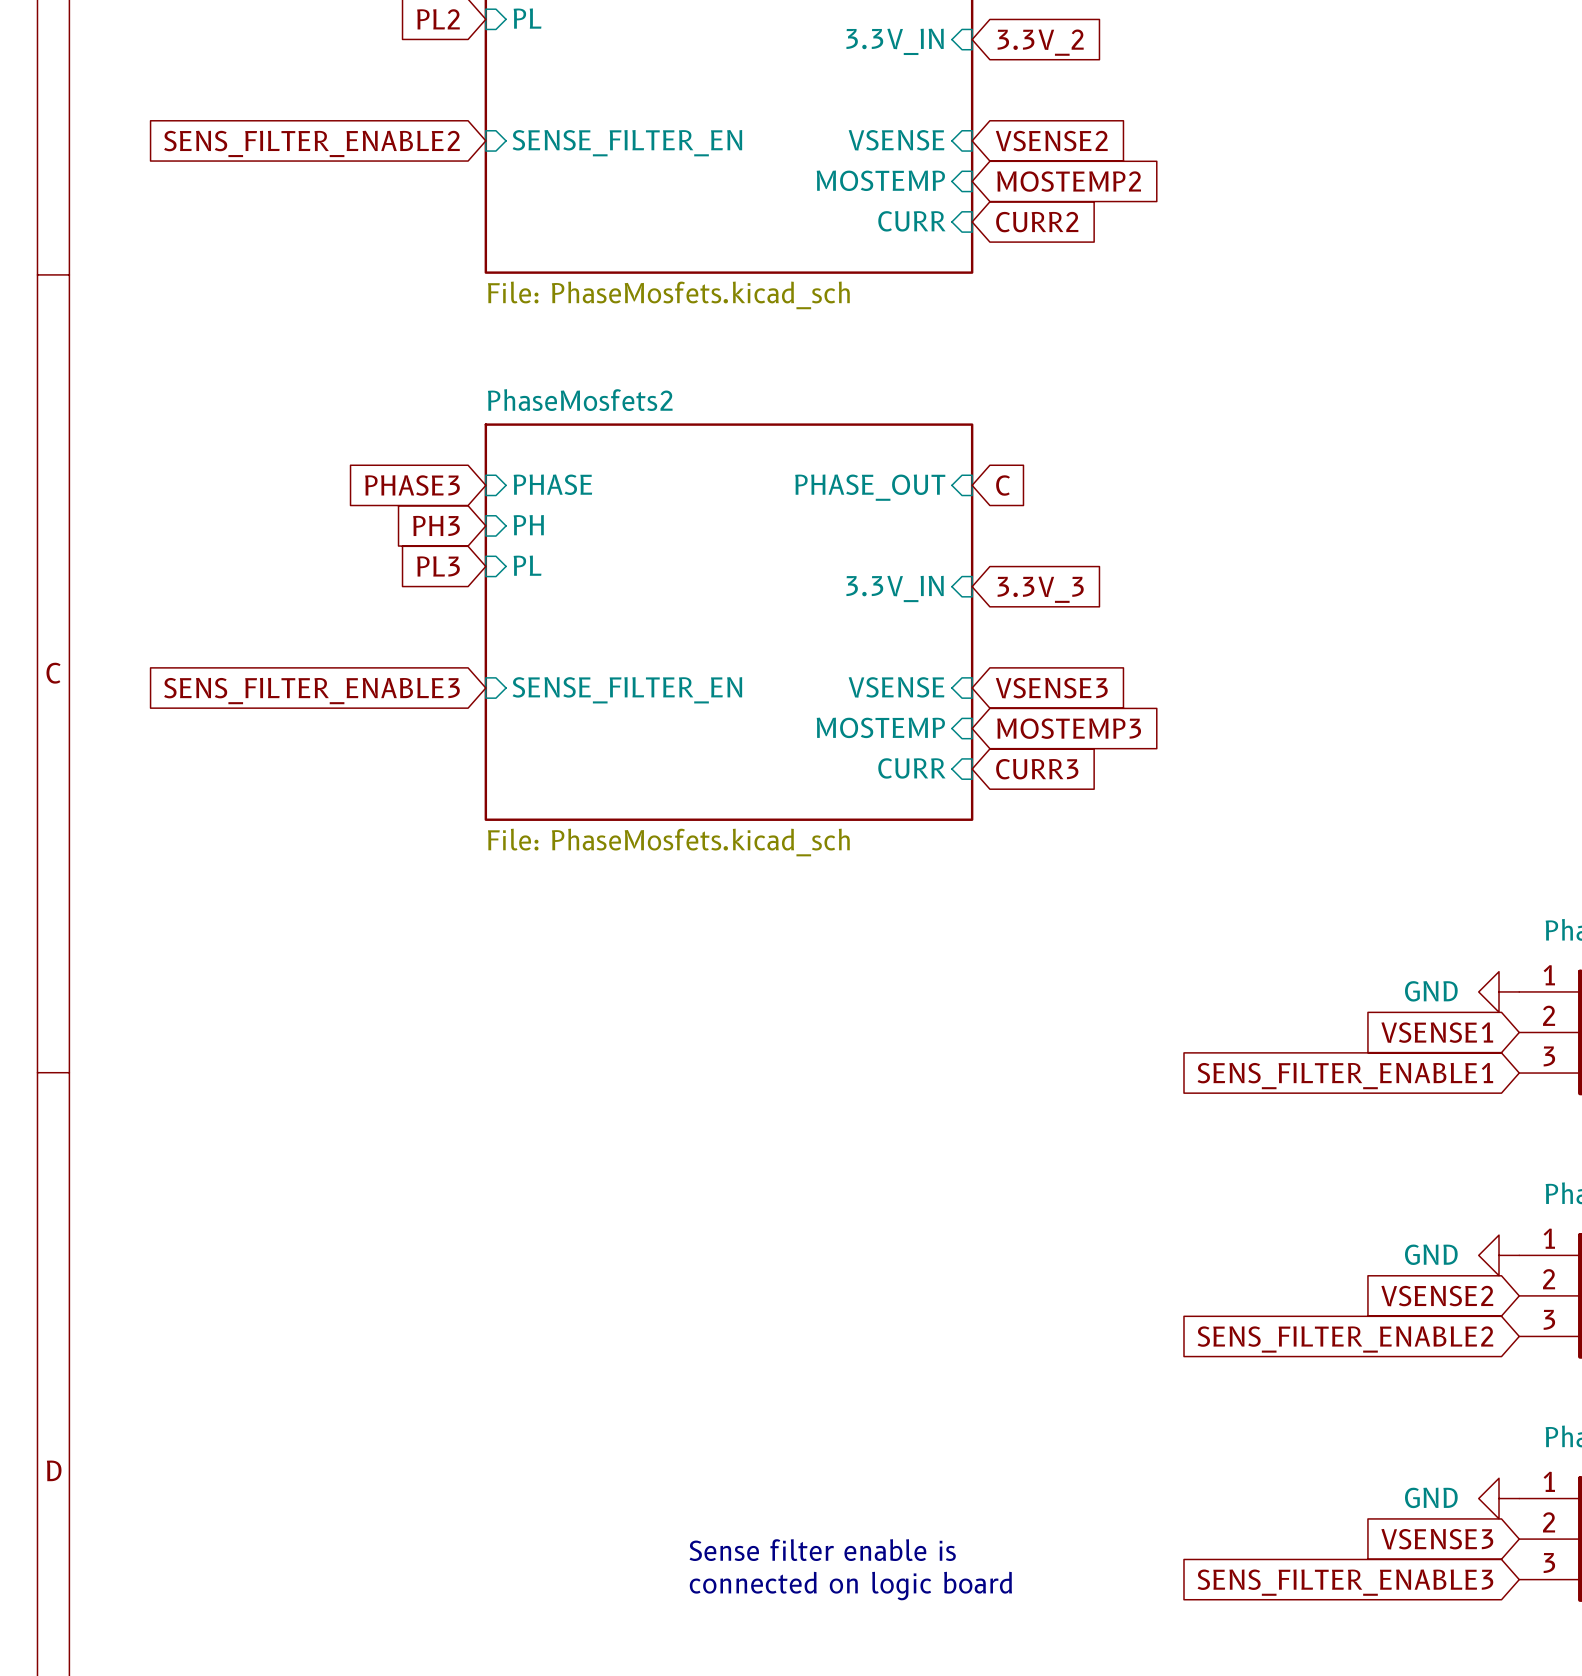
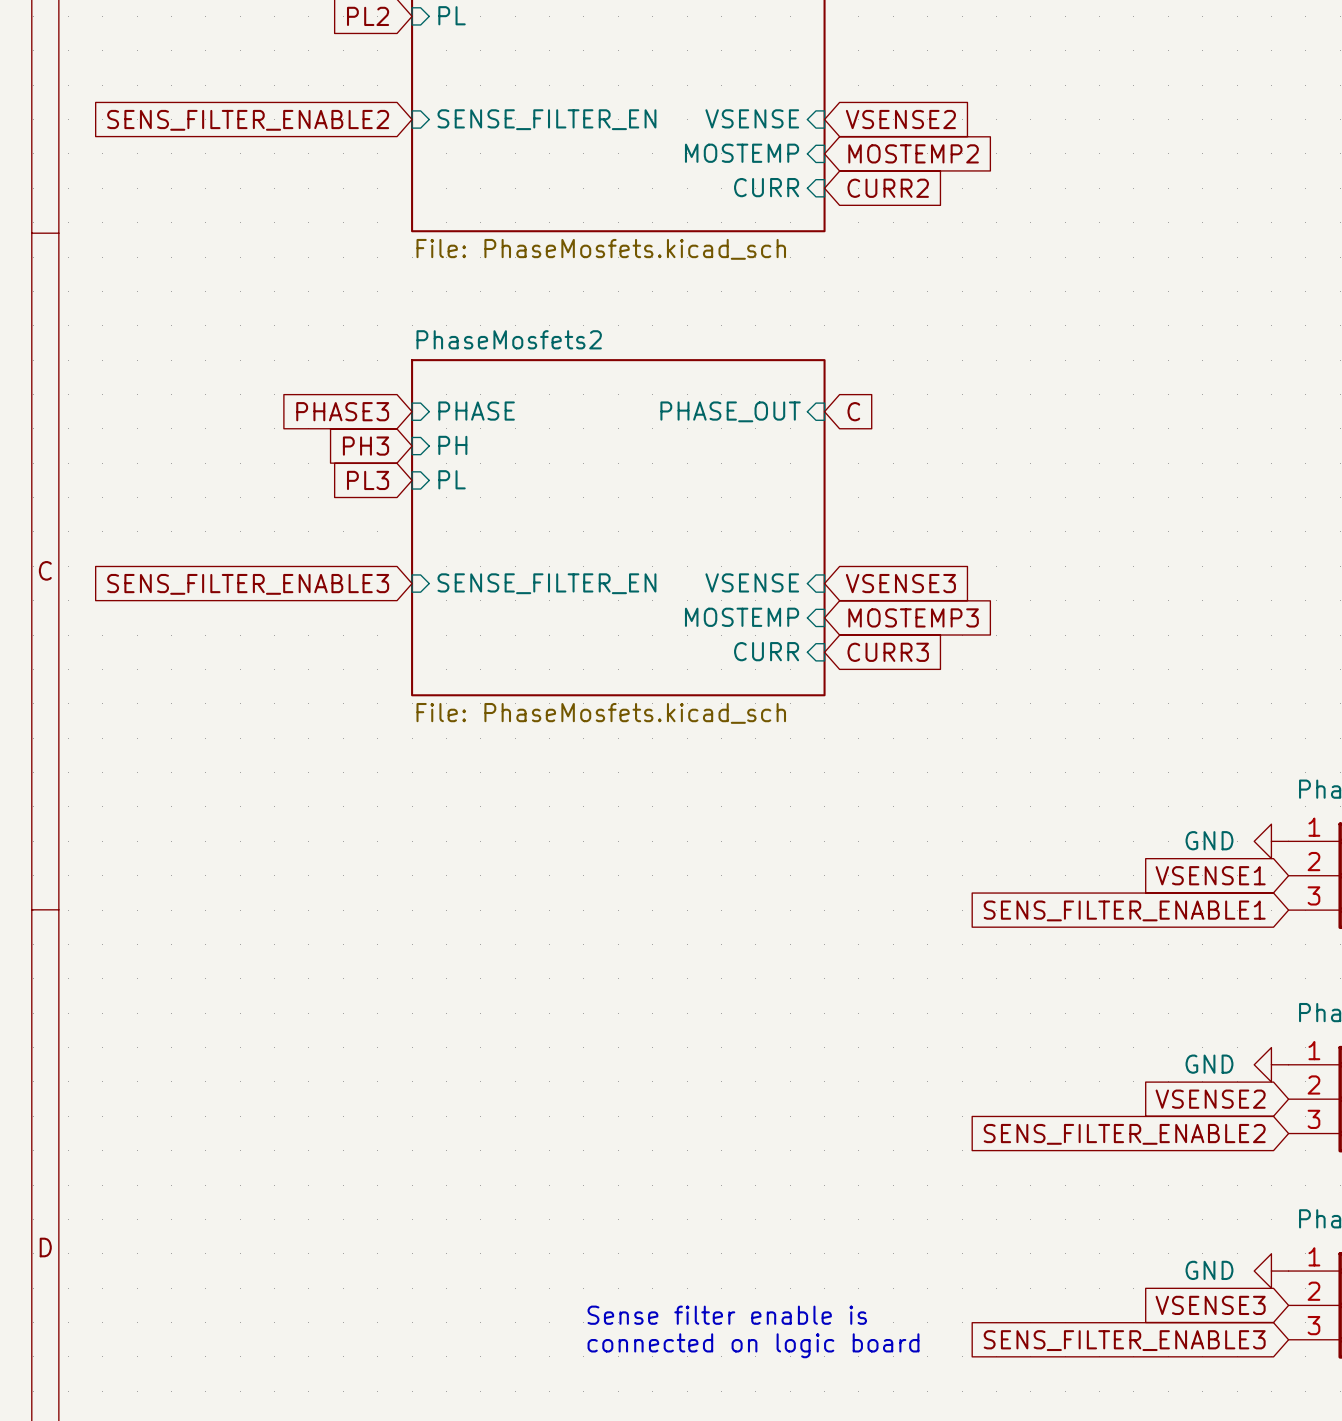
sheet pin: 3.3V_IN (895, 41) -> none
global label: 3.3V_2 (1040, 42) -> none
sheet pin: 3.3V_IN (895, 588) -> none
global label: 3.3V_3 (1040, 589) -> none

